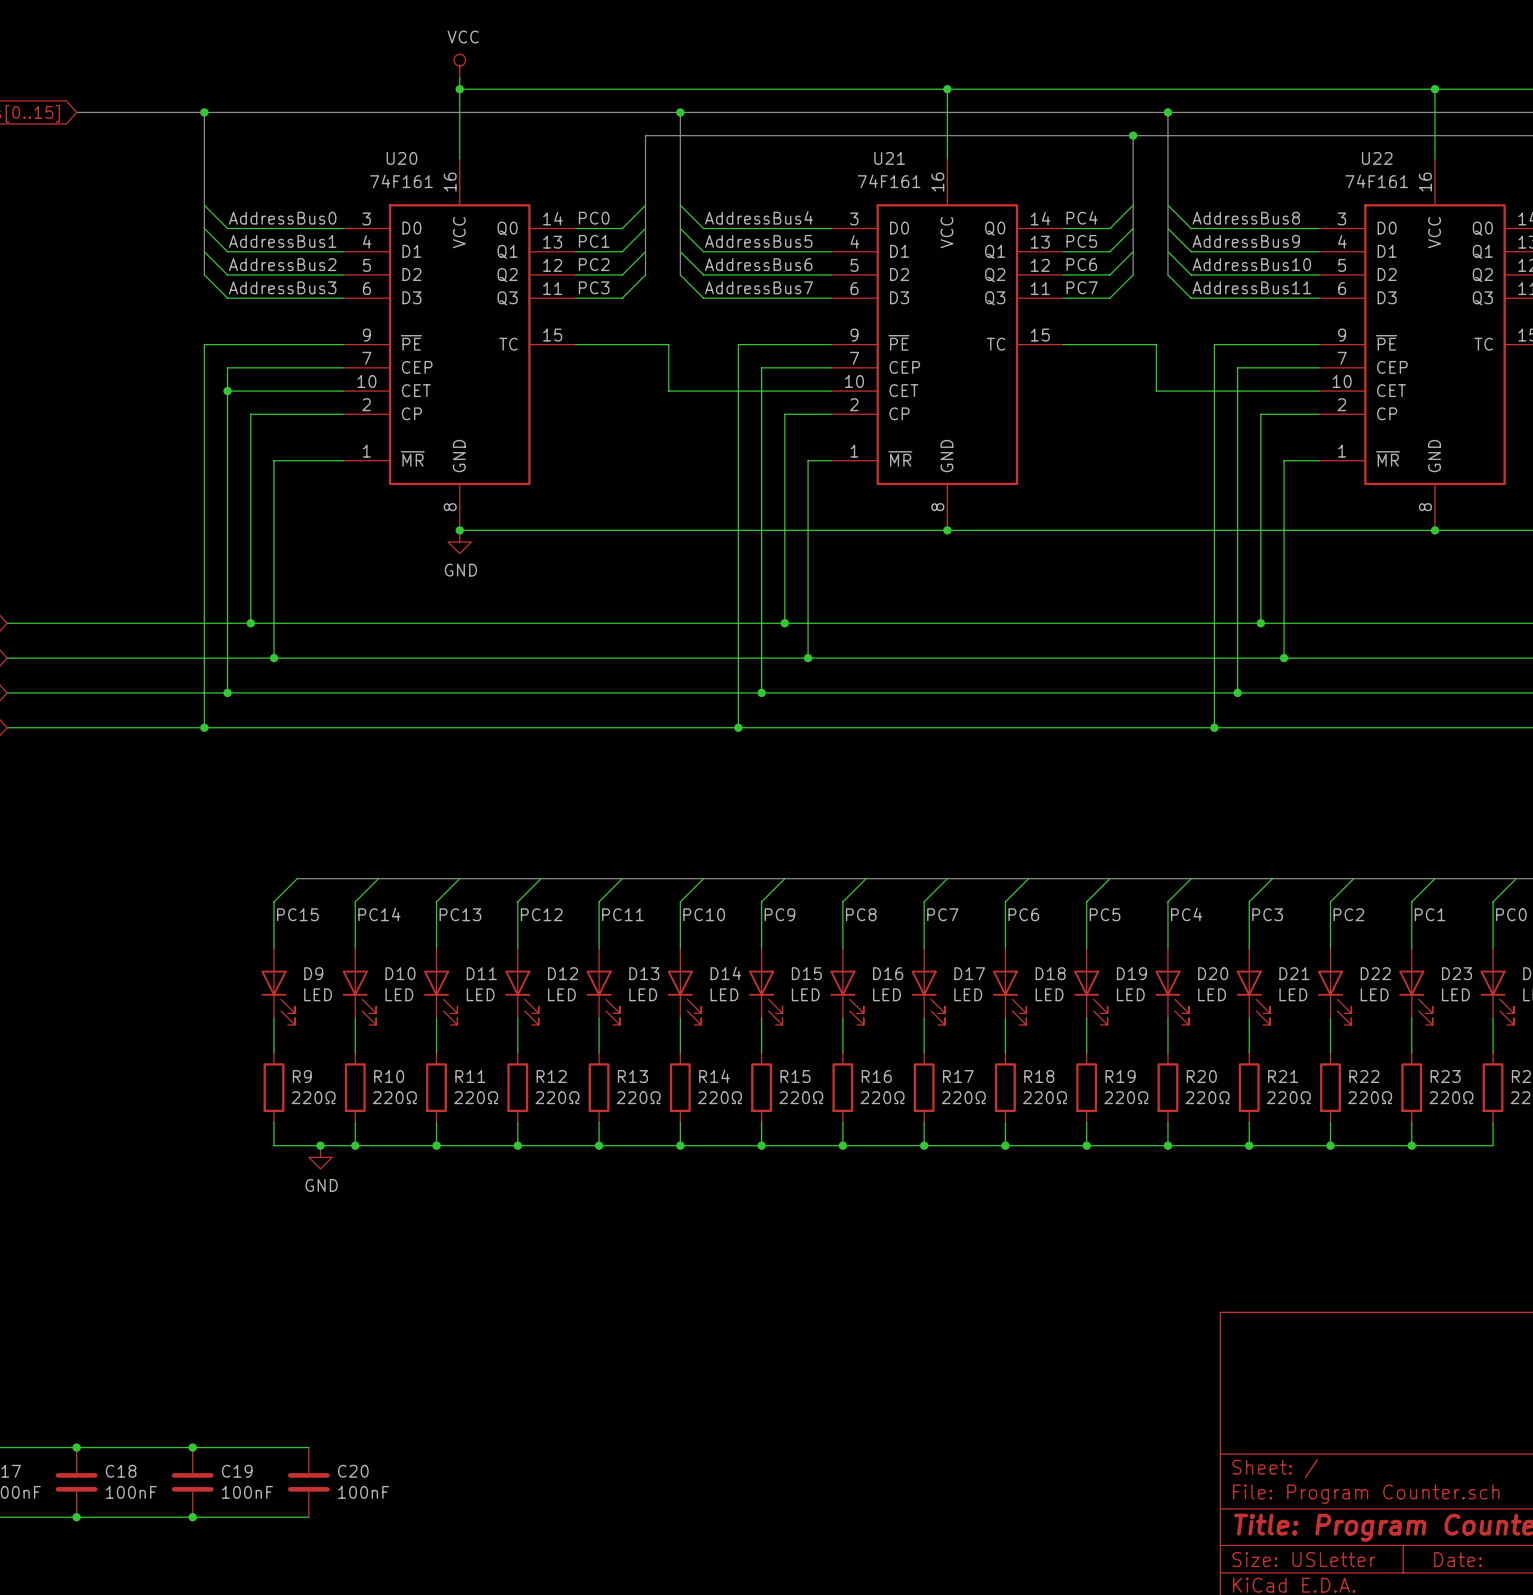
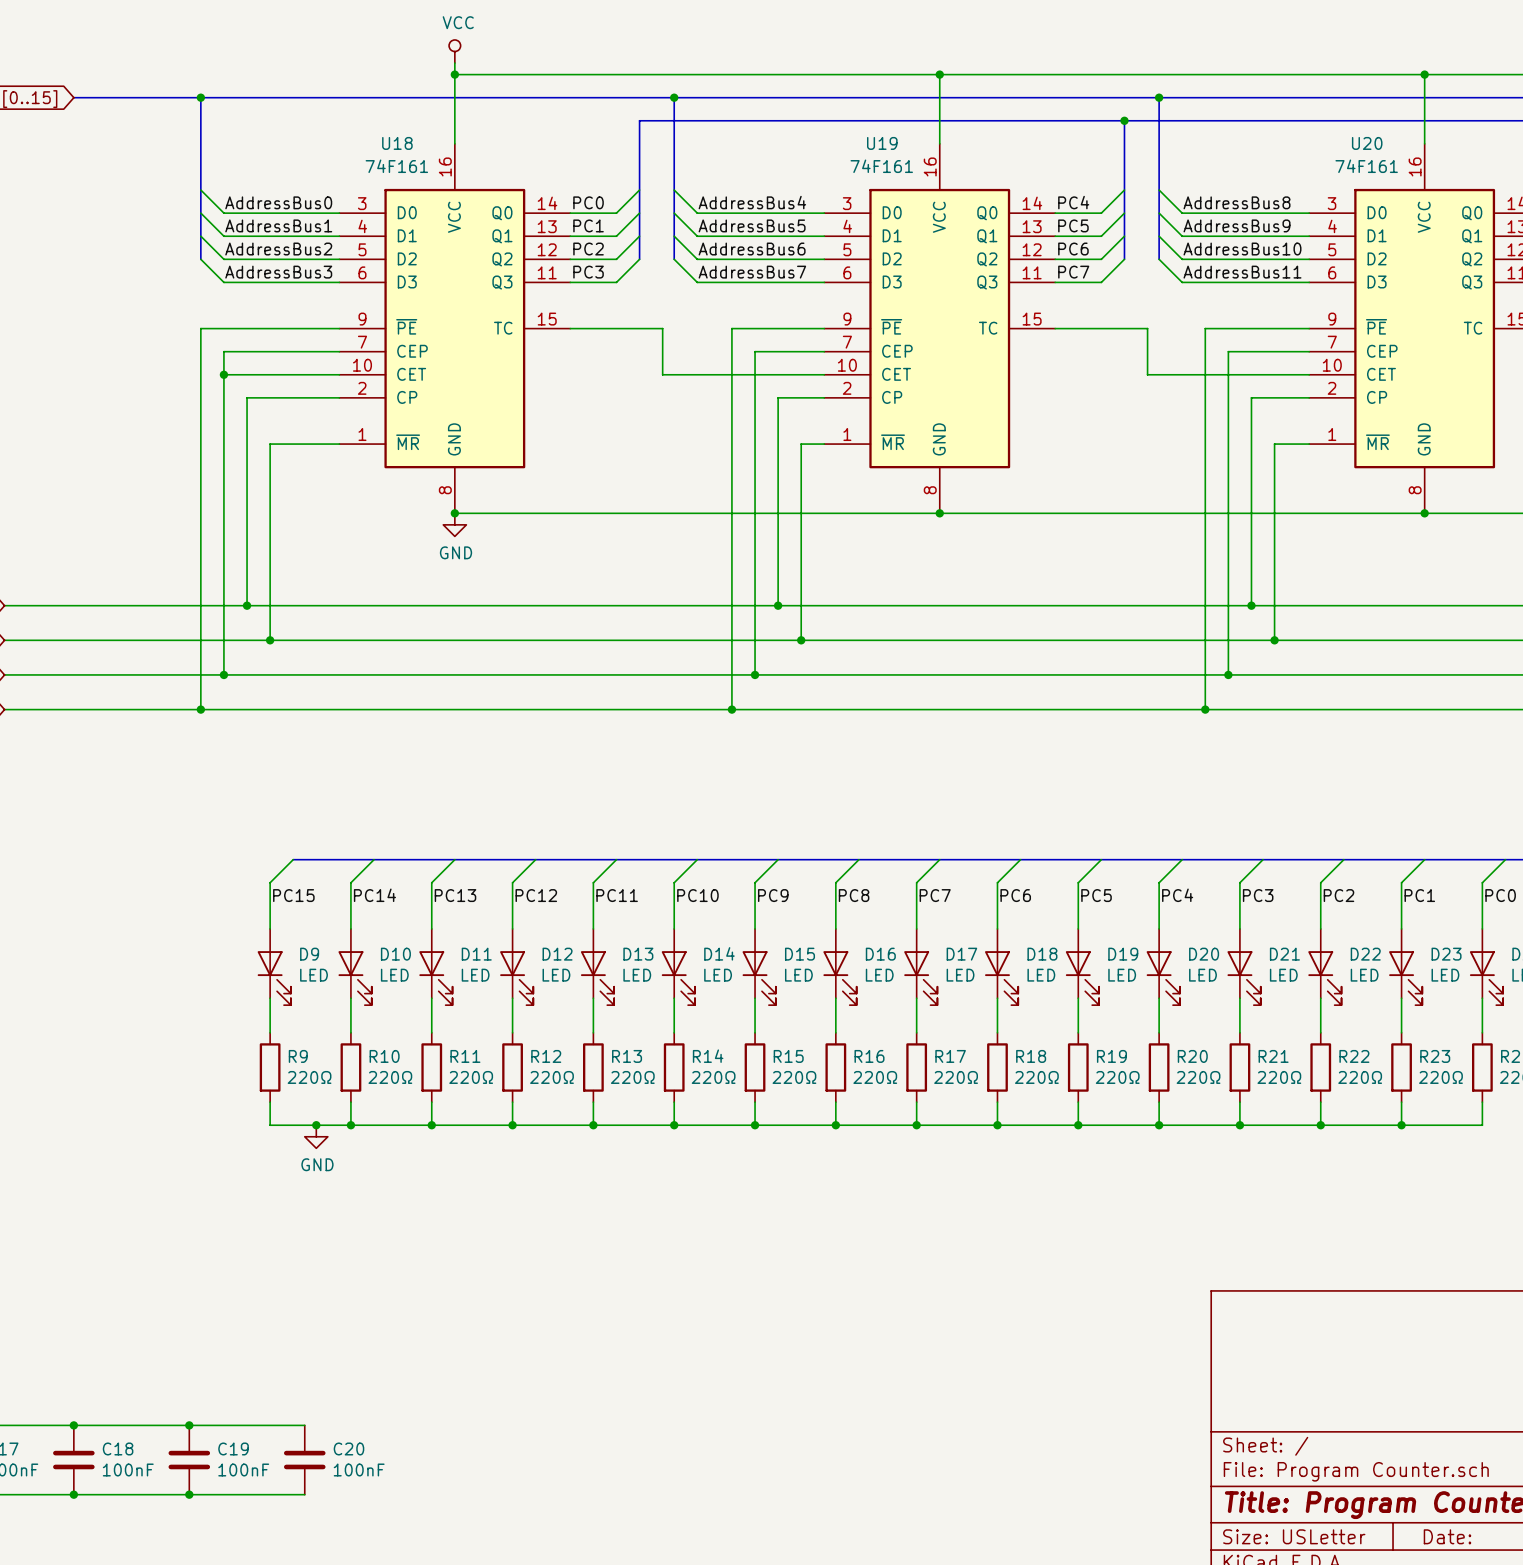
U20 name: U20 (401, 158) -> U18 (397, 143)
U21 name: U21 (889, 158) -> U19 (882, 143)
U22 name: U22 (1377, 158) -> U20 (1367, 143)

